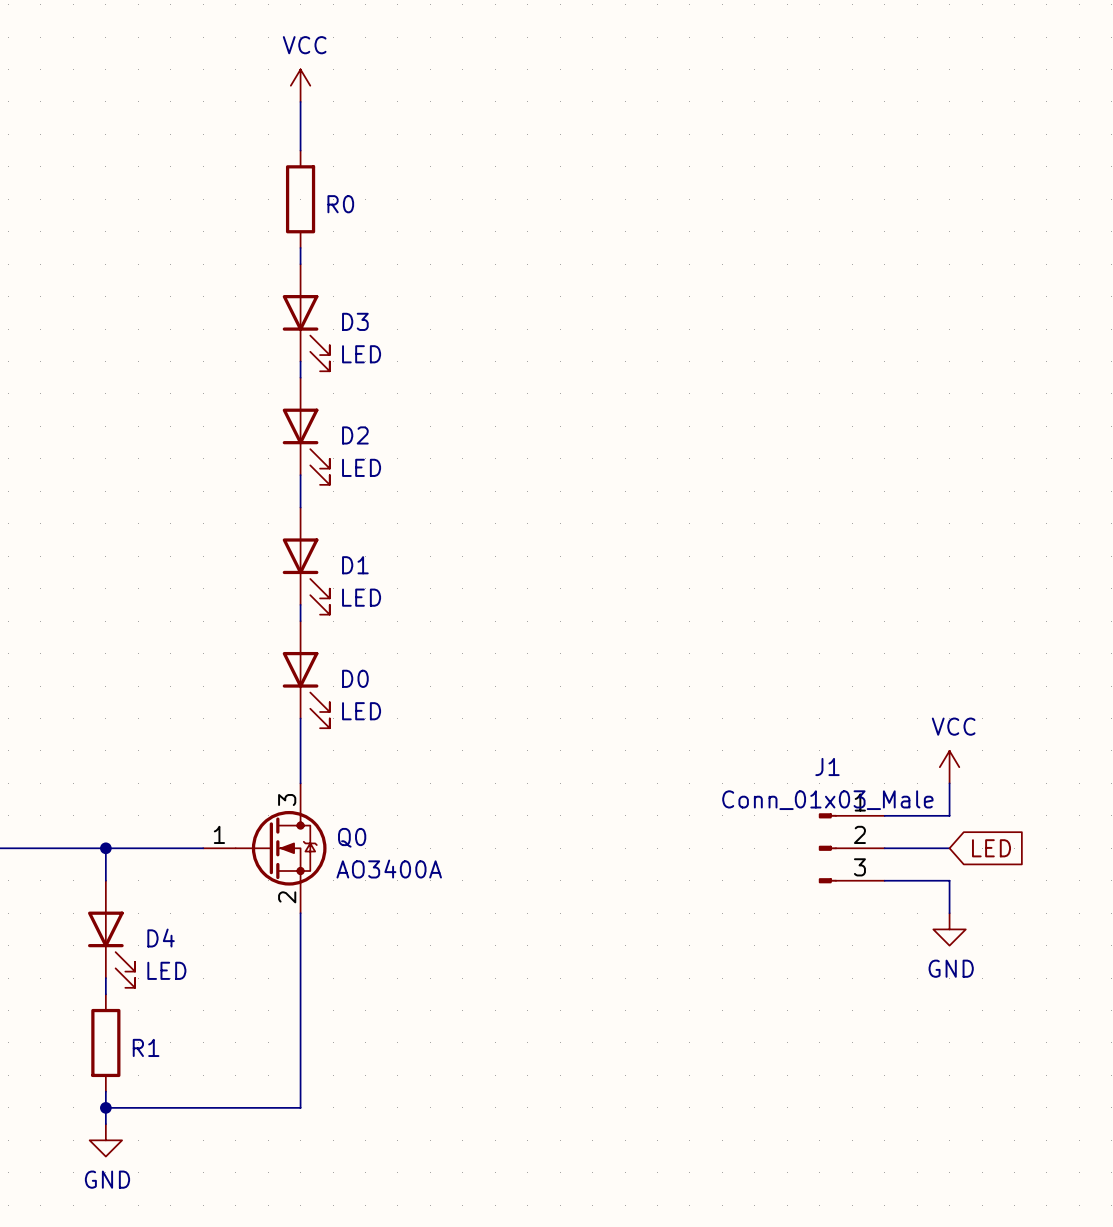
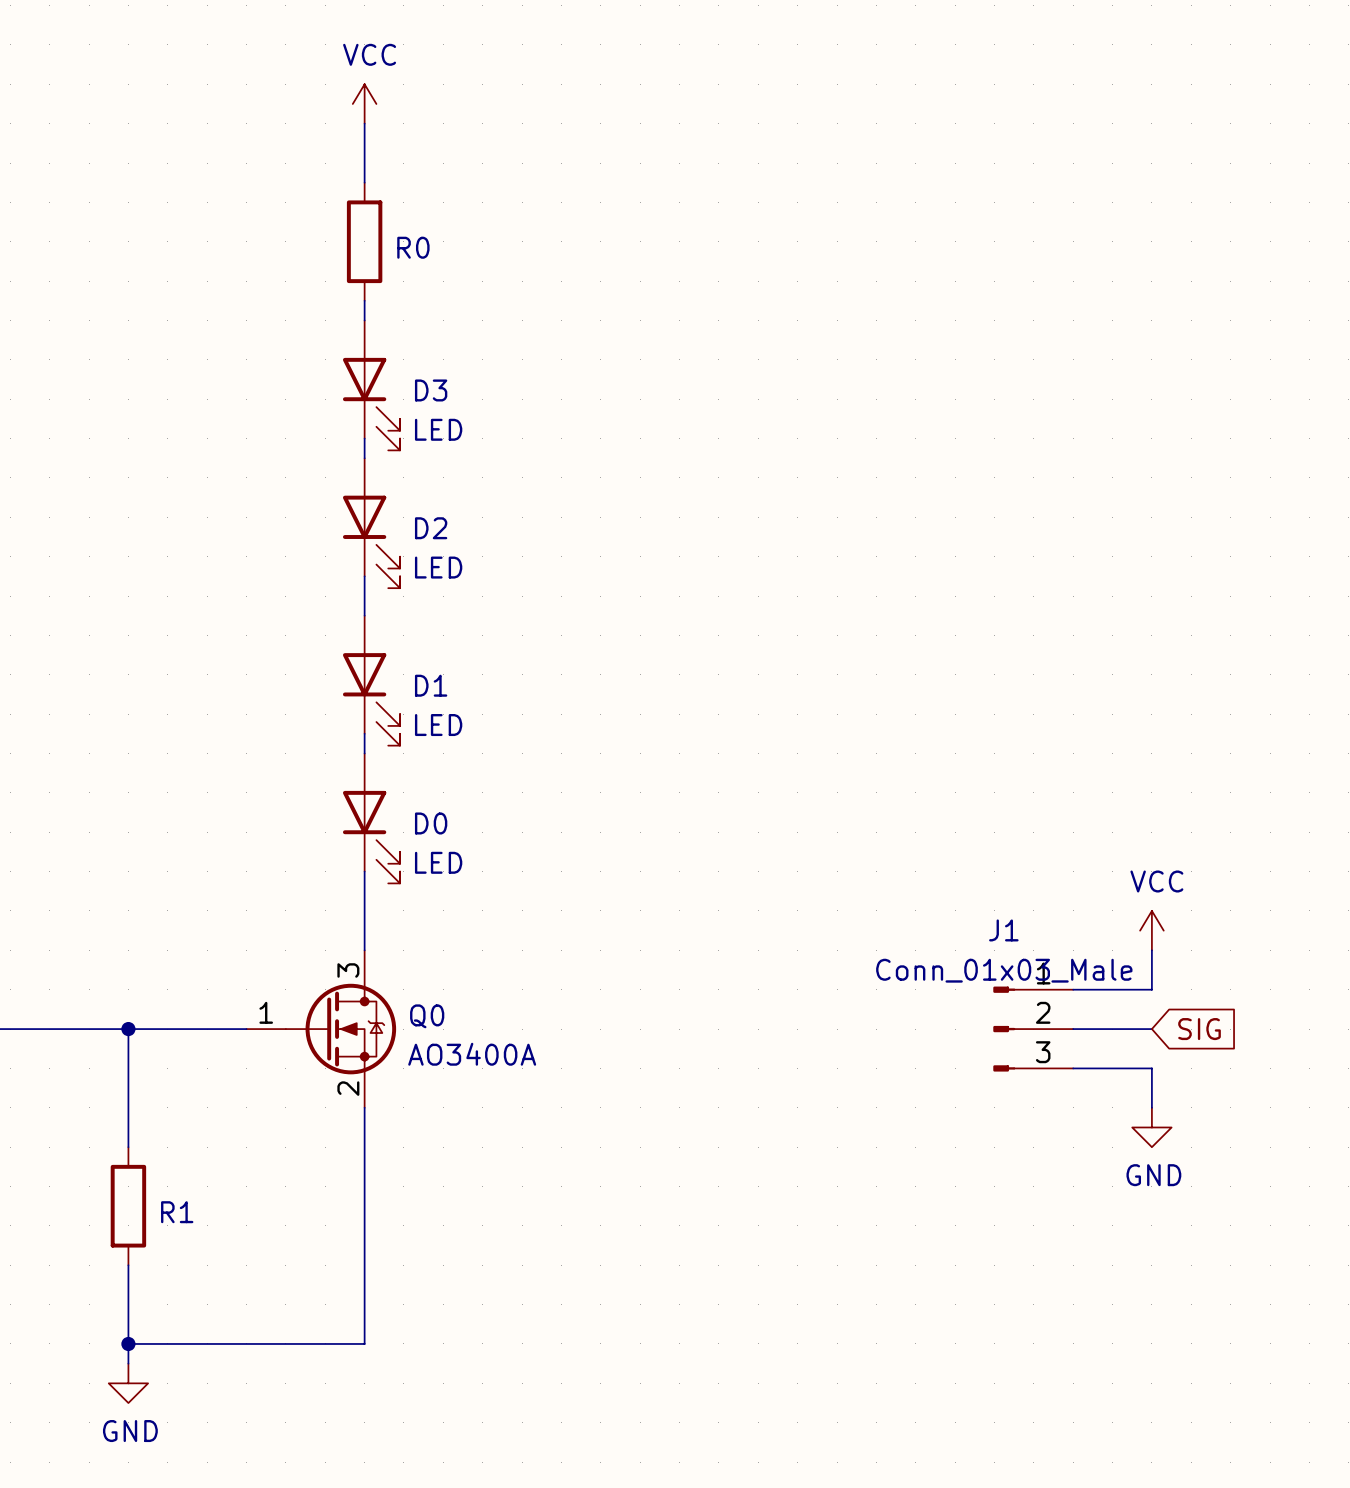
global label: LED (991, 848) -> SIG (1199, 1029)
D4: LED (111, 934) -> none
wire: (105, 978) (105, 994) -> none
wire: none -> (128, 1265) (128, 1324)
R1 position: (105, 1042) -> (128, 1206)

